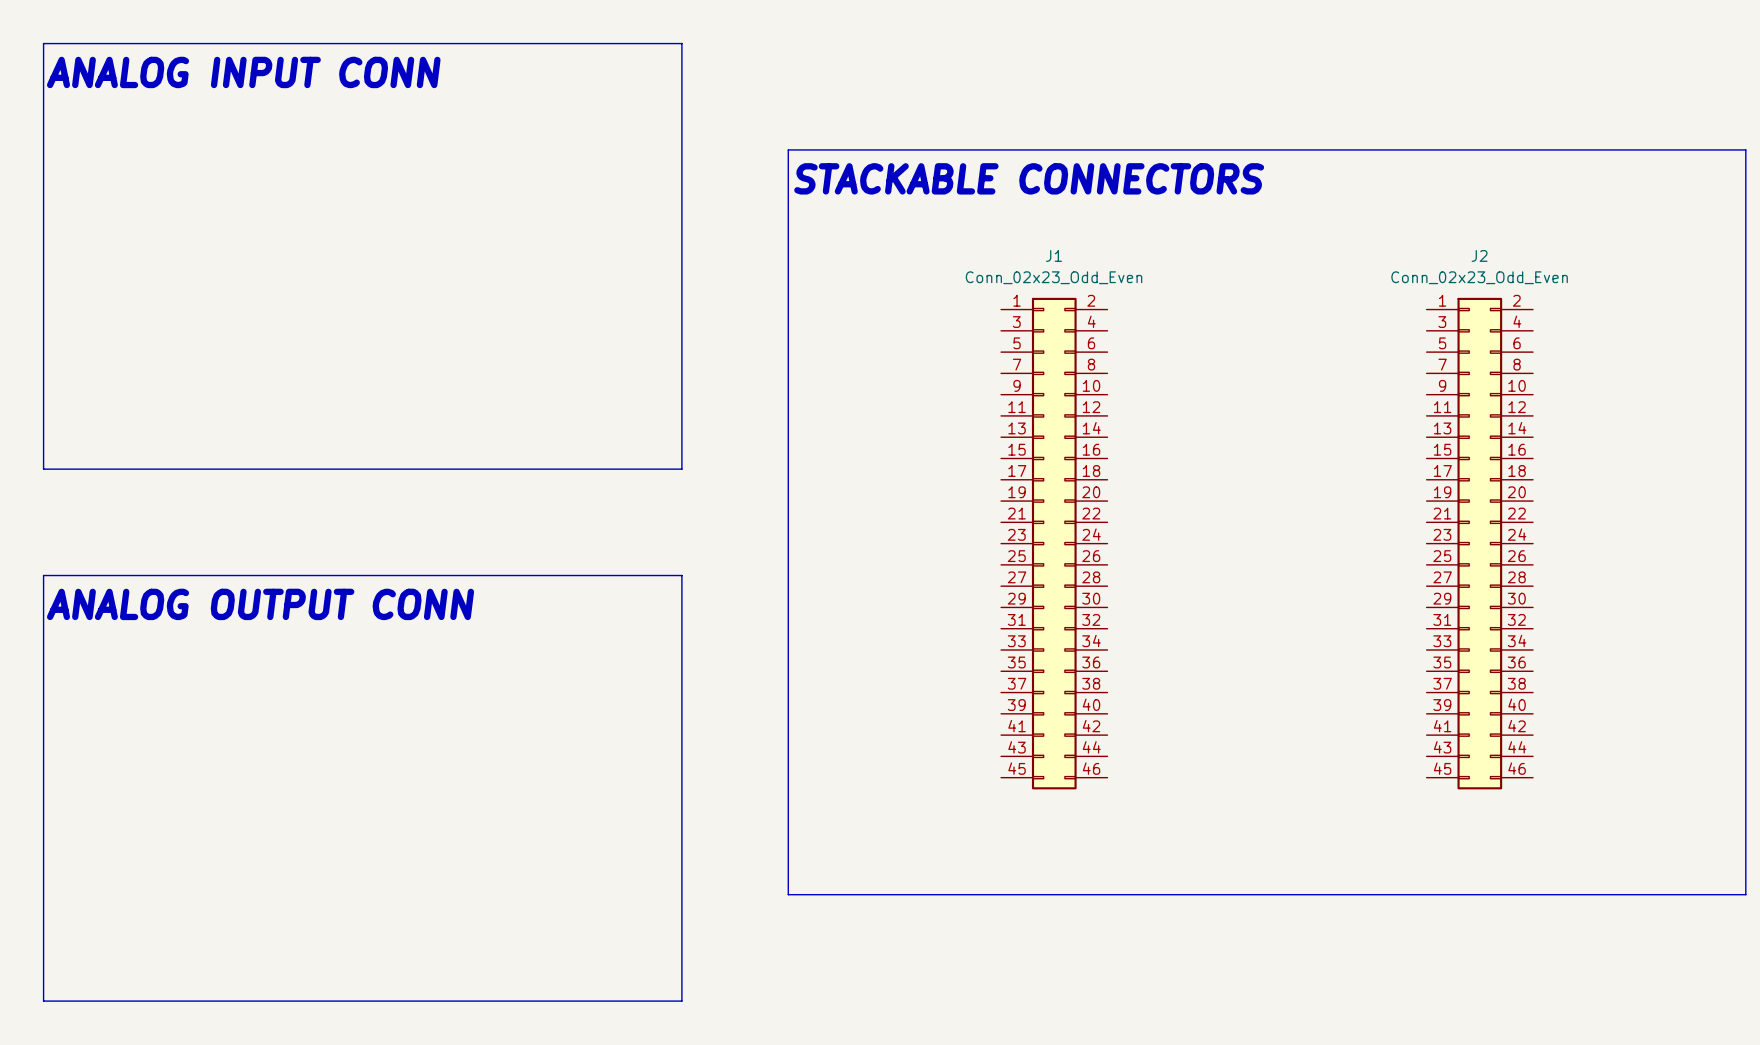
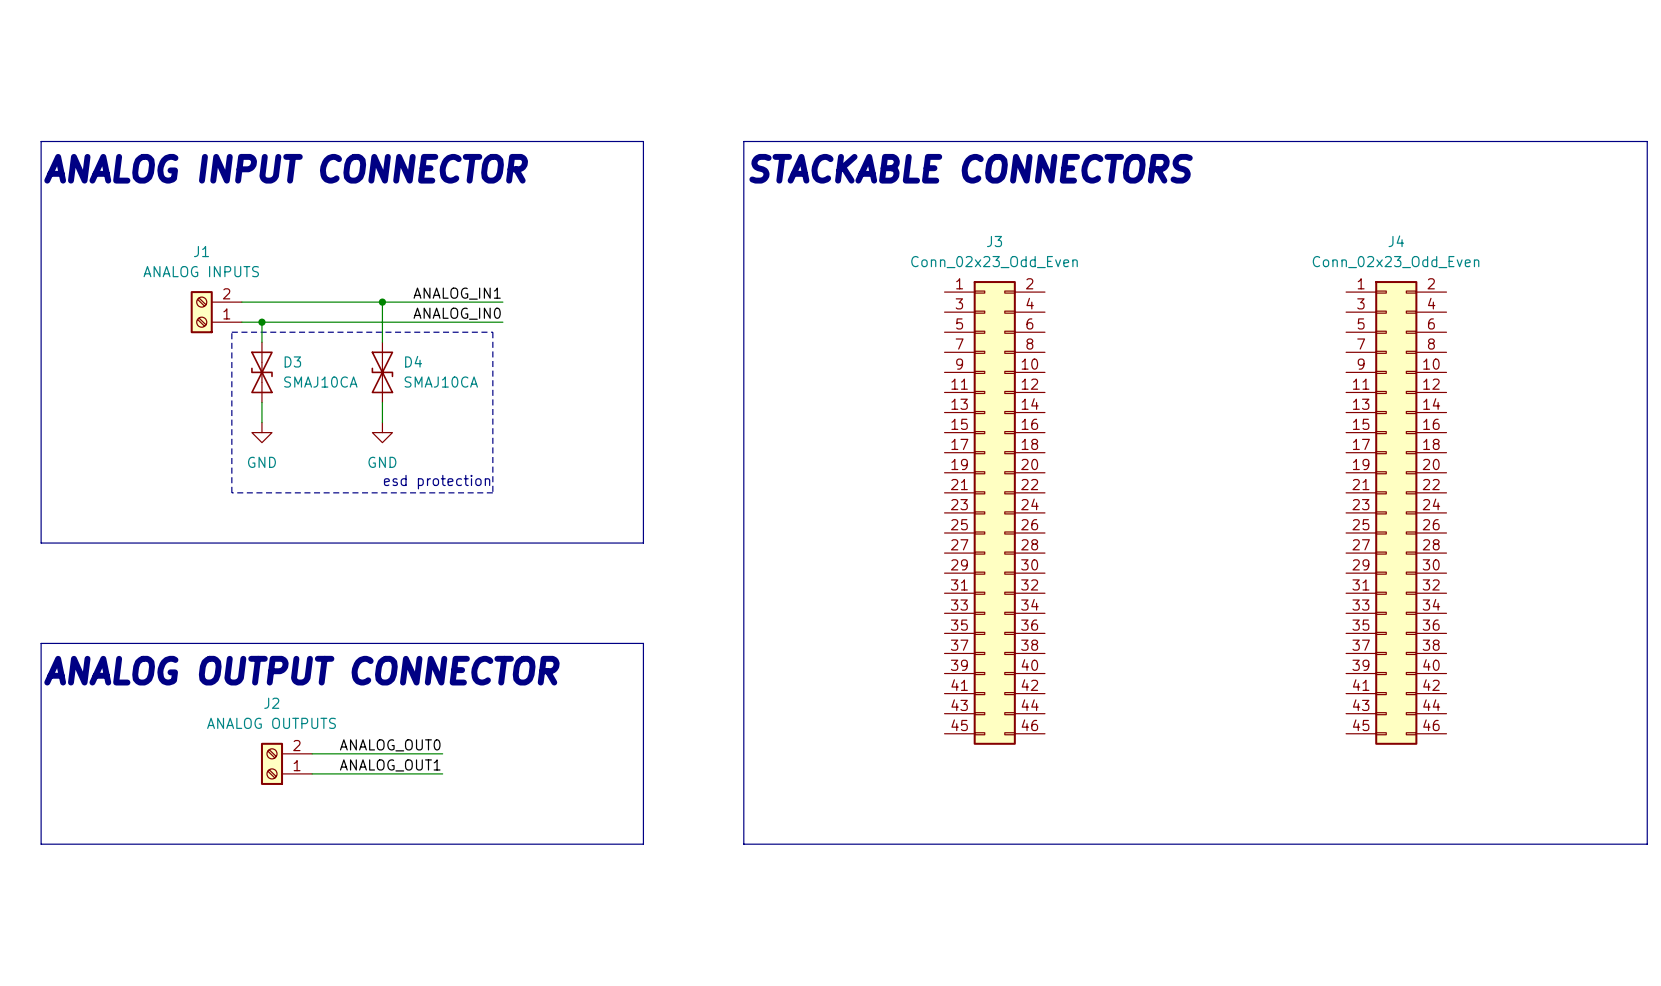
text: ANALOG INPUT CONN (243, 72) -> none
line: (43, 149) (43, 43) (681, 43) (681, 149) -> (41, 141) (643, 141)
text: none -> ANALOG INPUT CONNECTOR (286, 168)
J1 name: J1 (1054, 255) -> J3 (994, 241)
J2 name: J2 (1479, 255) -> J4 (1396, 241)
label: none -> ANALOG_IN1 (457, 293)
wire: none -> (241, 302) (502, 302)
wire: none -> (382, 302) (382, 342)
junction: none -> (382, 302)
J1: none -> ANALOG INPUTS (216, 312)
label: none -> ANALOG_IN0 (457, 313)
wire: none -> (241, 322) (502, 322)
wire: none -> (261, 322) (261, 342)
junction: none -> (261, 322)
line: none -> (231, 332) (492, 332) (492, 492) (231, 492) (231, 332)
D3: none -> SMAJ10CA (261, 372)
D4: none -> SMAJ10CA (382, 372)
wire: none -> (261, 402) (261, 422)
wire: none -> (382, 402) (382, 422)
power symbol: none -> GND (261, 432)
power symbol: none -> GND (382, 432)
line: (43, 469) (681, 469) -> none
text: none -> esd protection (437, 482)
line: (43, 575) (43, 681) -> (41, 543) (41, 442)
line: (681, 575) (681, 681) -> (643, 543) (643, 442)
text: ANALOG OUTPUT CONN (260, 604) -> none
line: none -> (41, 643) (643, 643)
text: none -> ANALOG OUTPUT CONNECTOR (301, 670)
label: none -> ANALOG_OUT0 (390, 745)
wire: none -> (312, 753) (442, 753)
J2: none -> ANALOG OUTPUTS (286, 763)
label: none -> ANALOG_OUT1 (390, 765)
wire: none -> (312, 773) (442, 773)
line: (43, 894) (43, 1001) (681, 1001) (681, 894) -> (41, 844) (643, 844)

